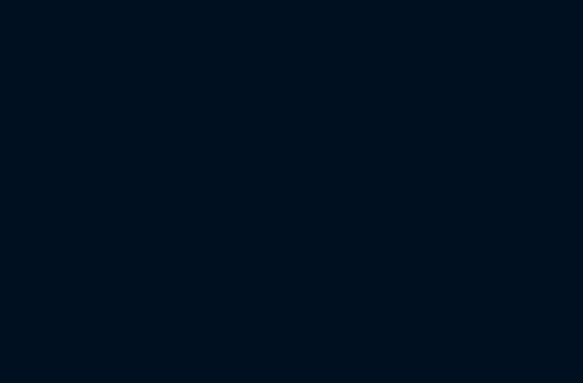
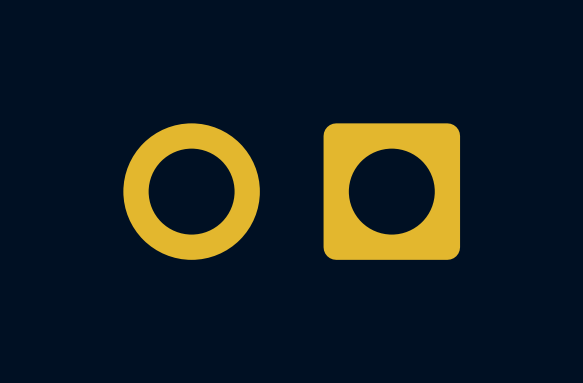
part: none -> (291, 191)

